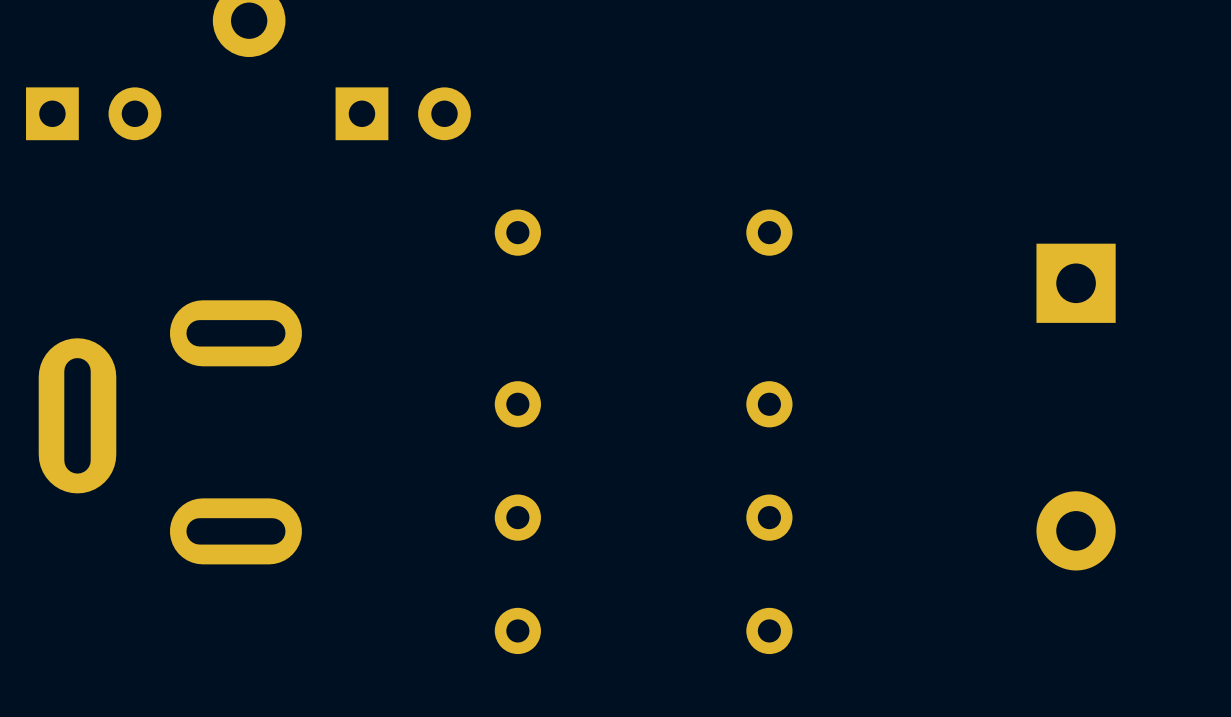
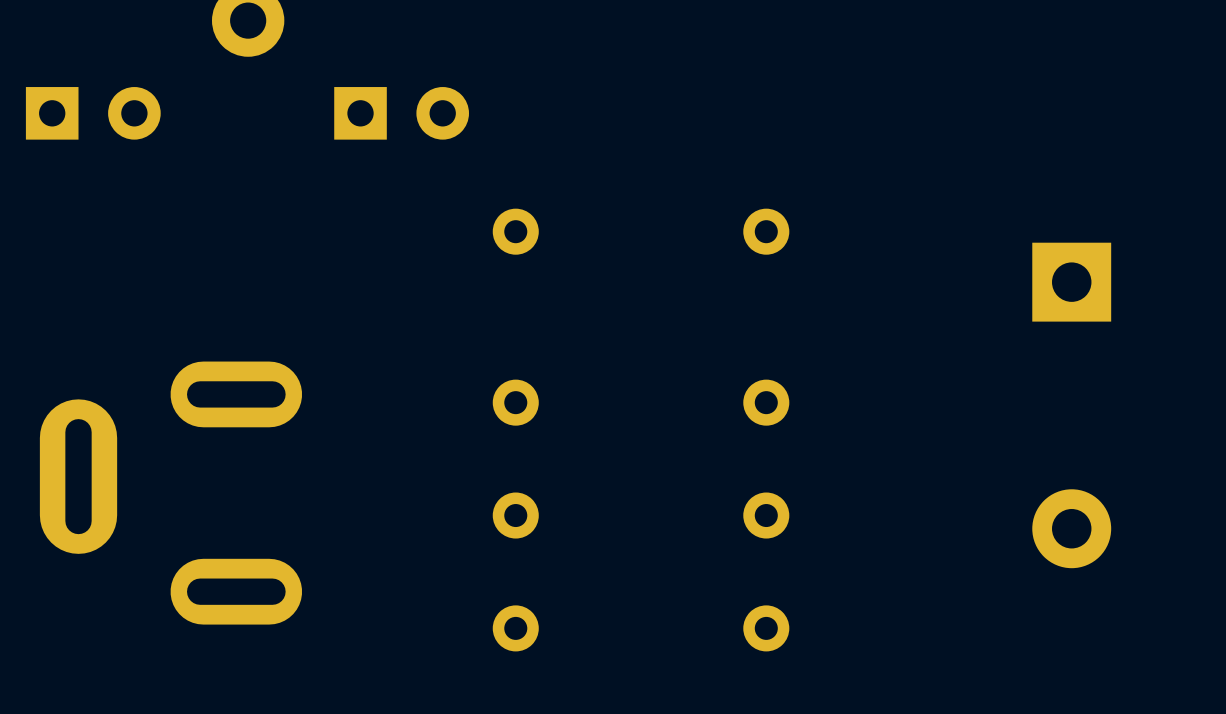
part position: (170, 432) -> (170, 493)

